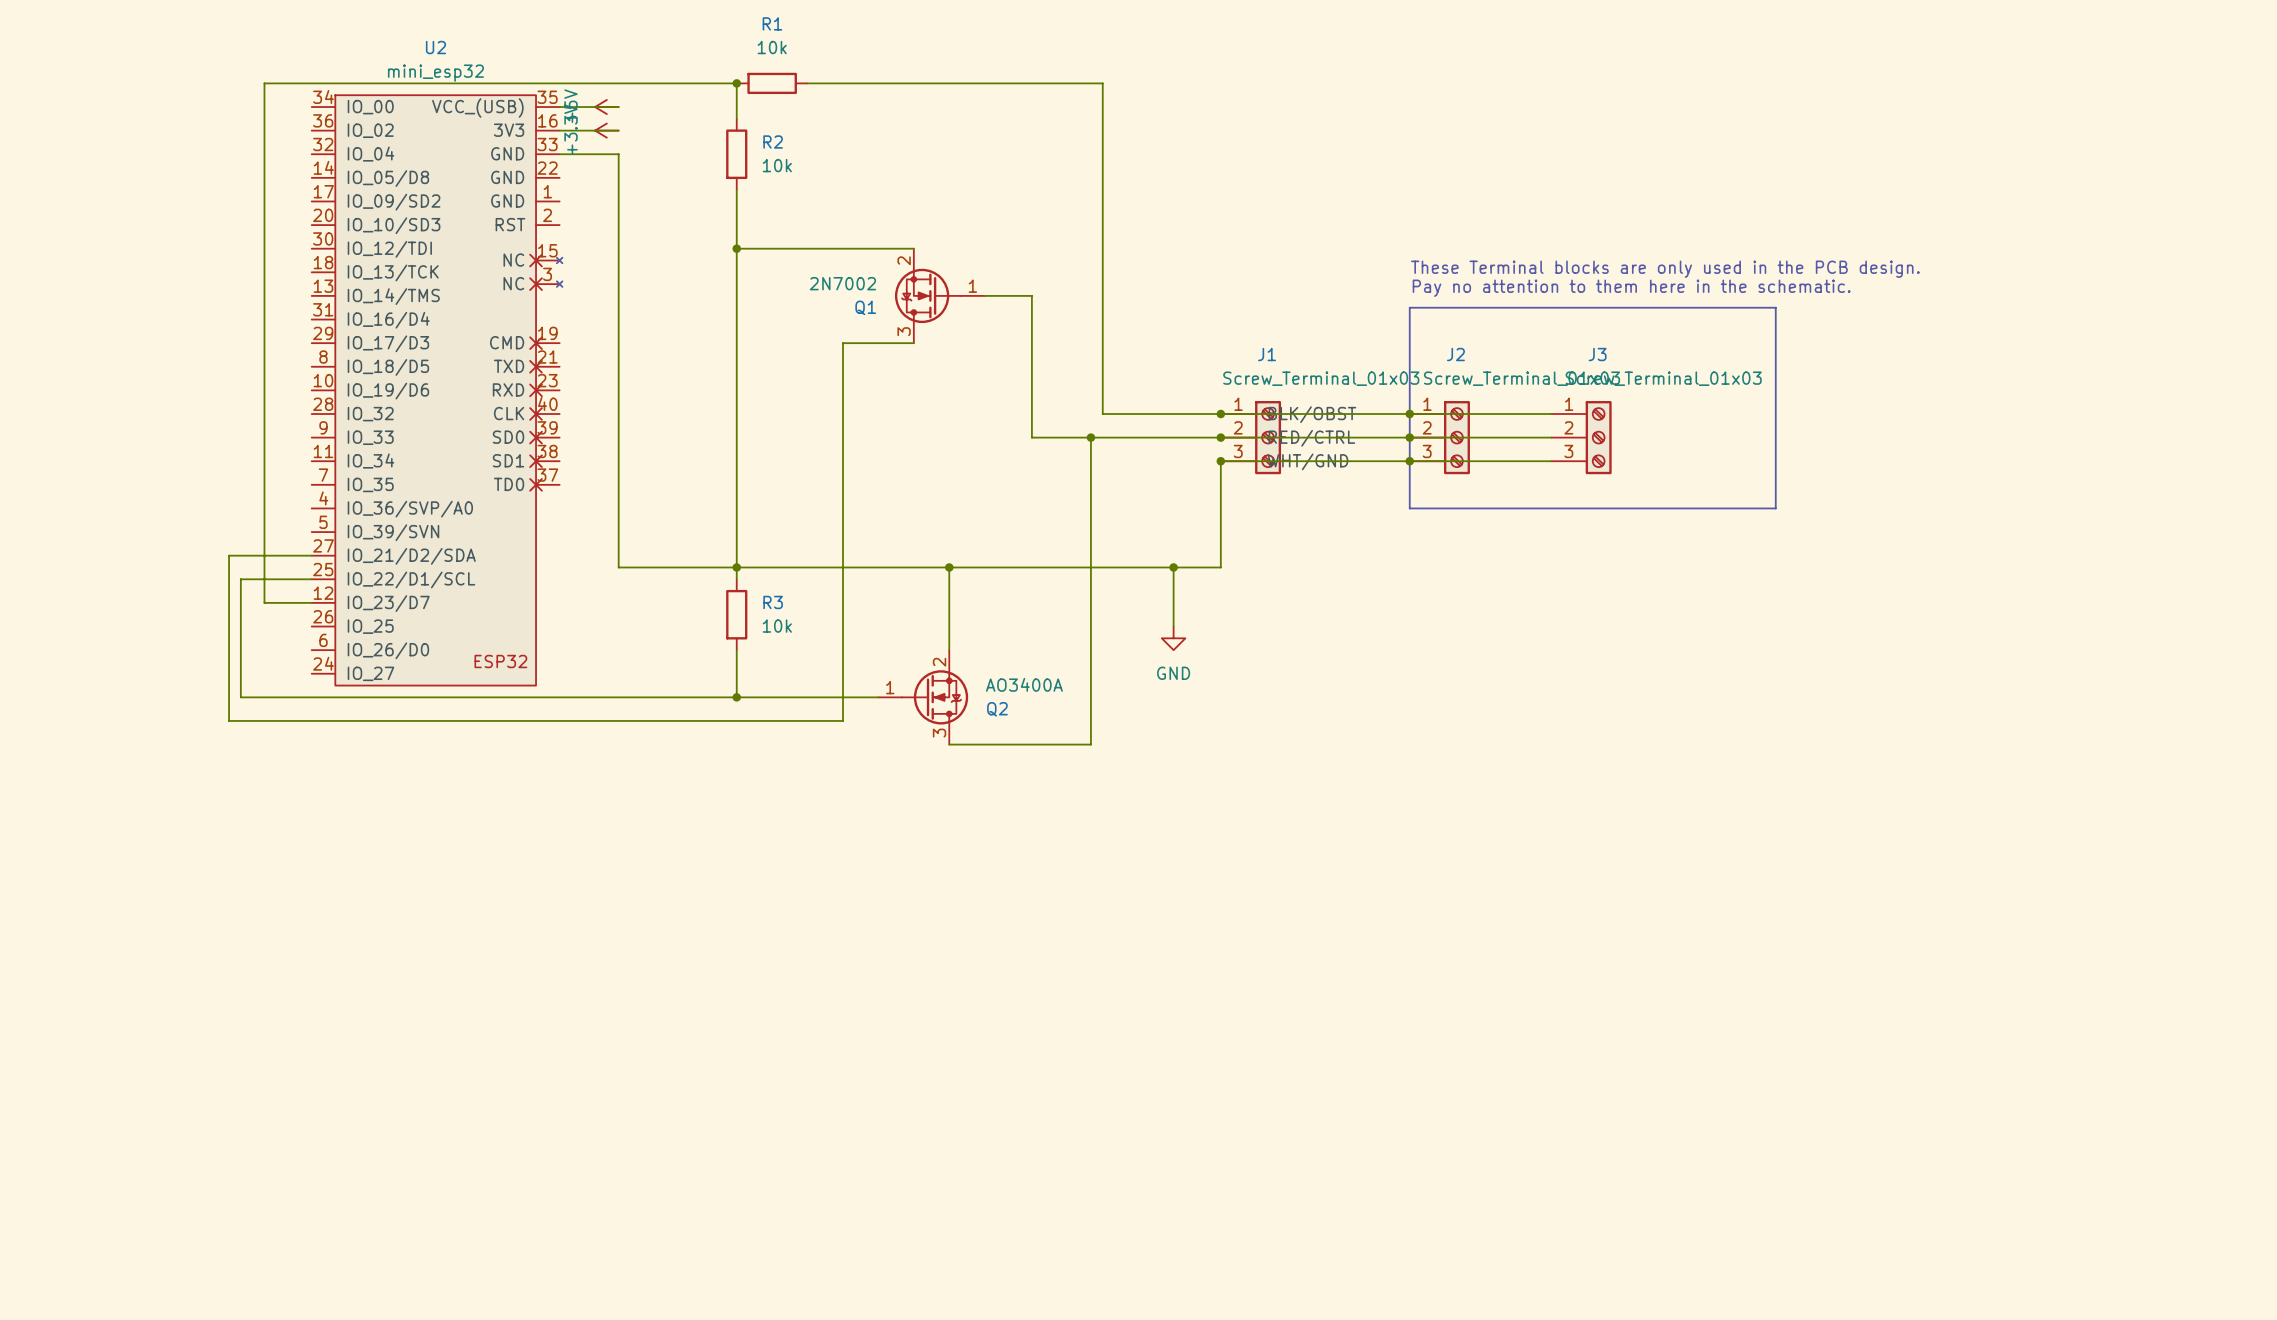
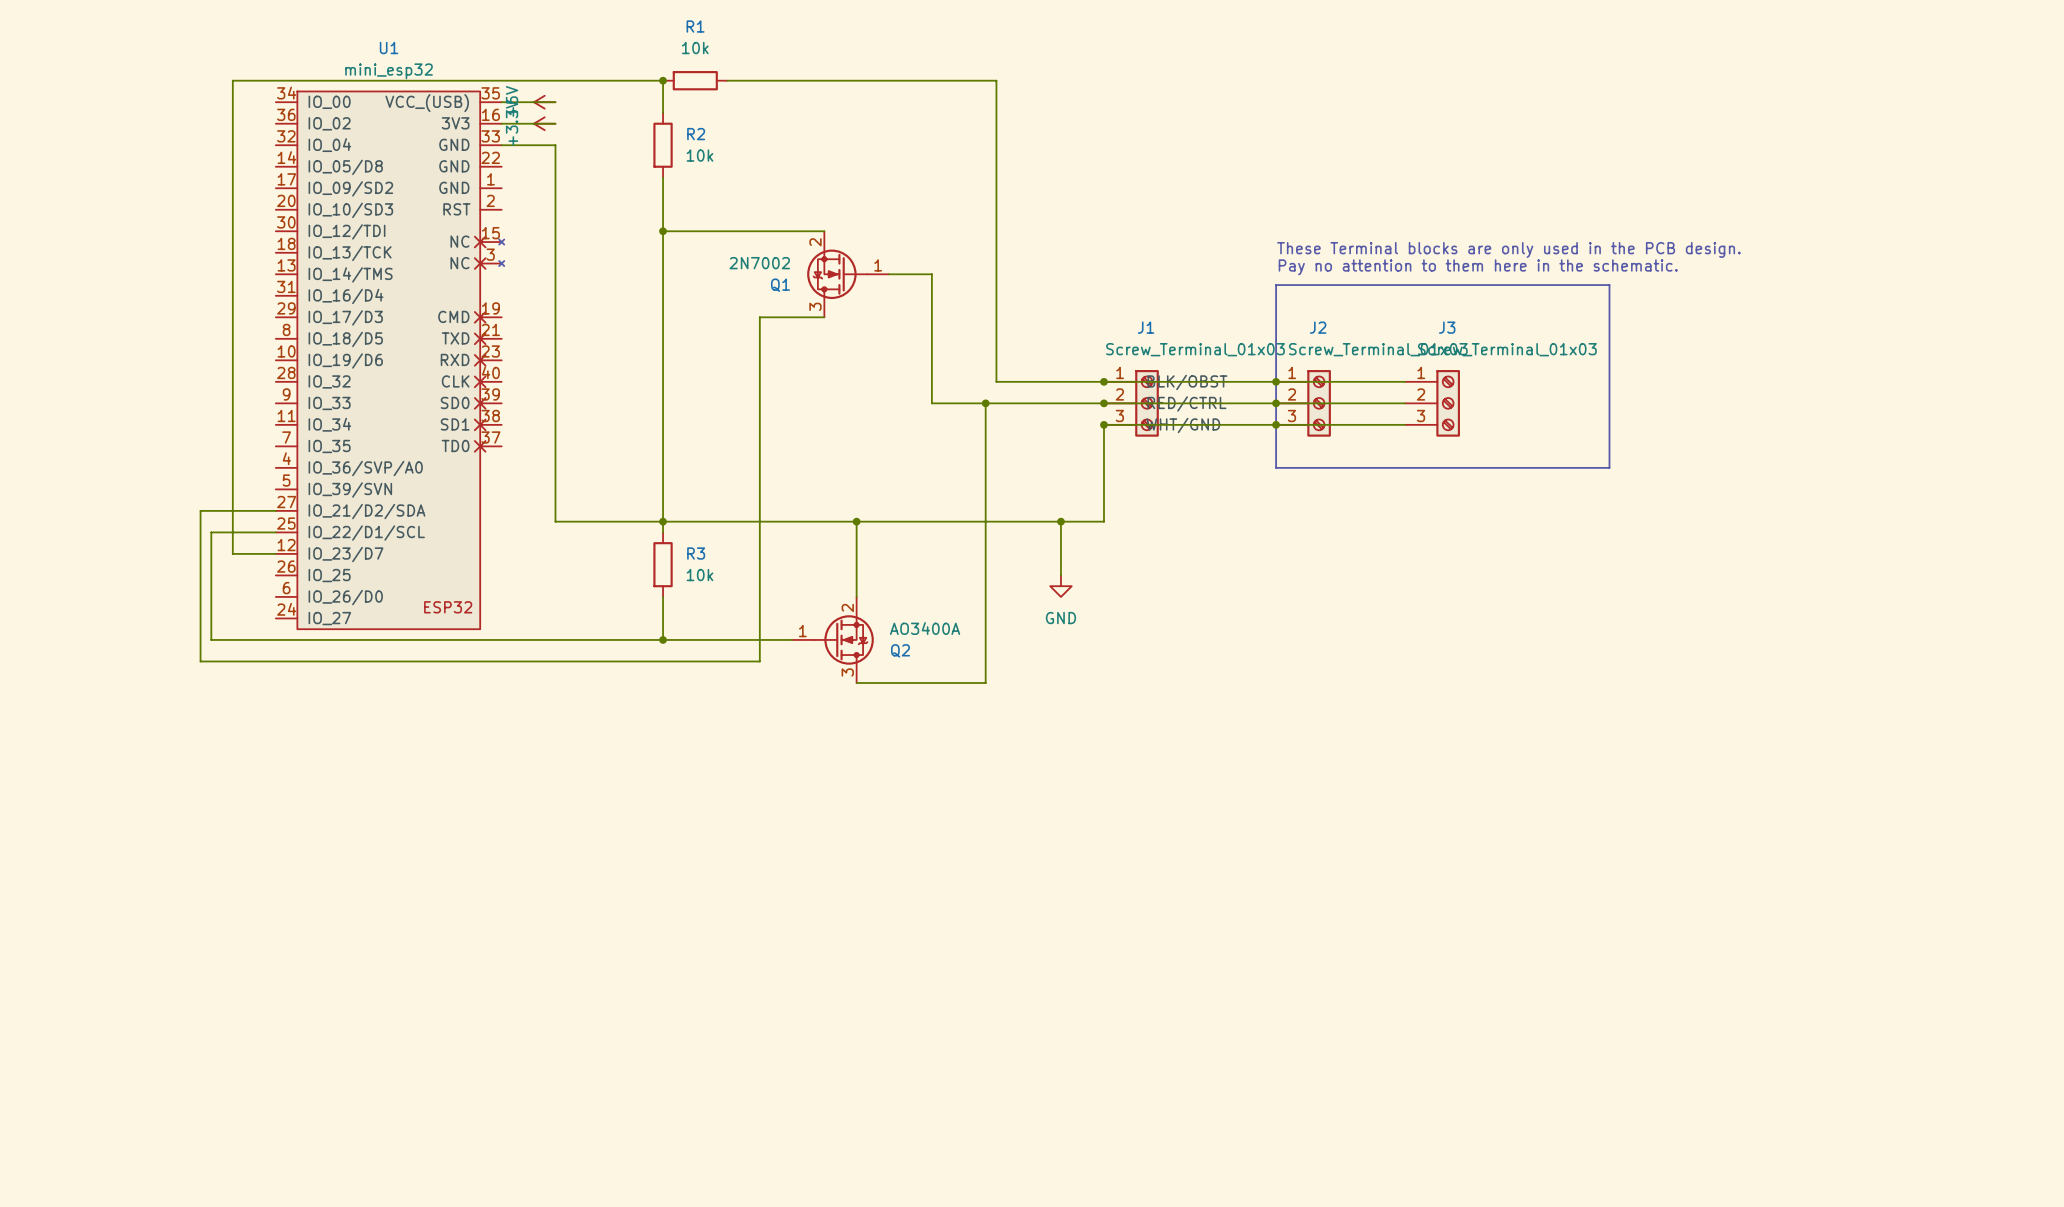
U2 name: U2 (435, 47) -> U1 (389, 48)

